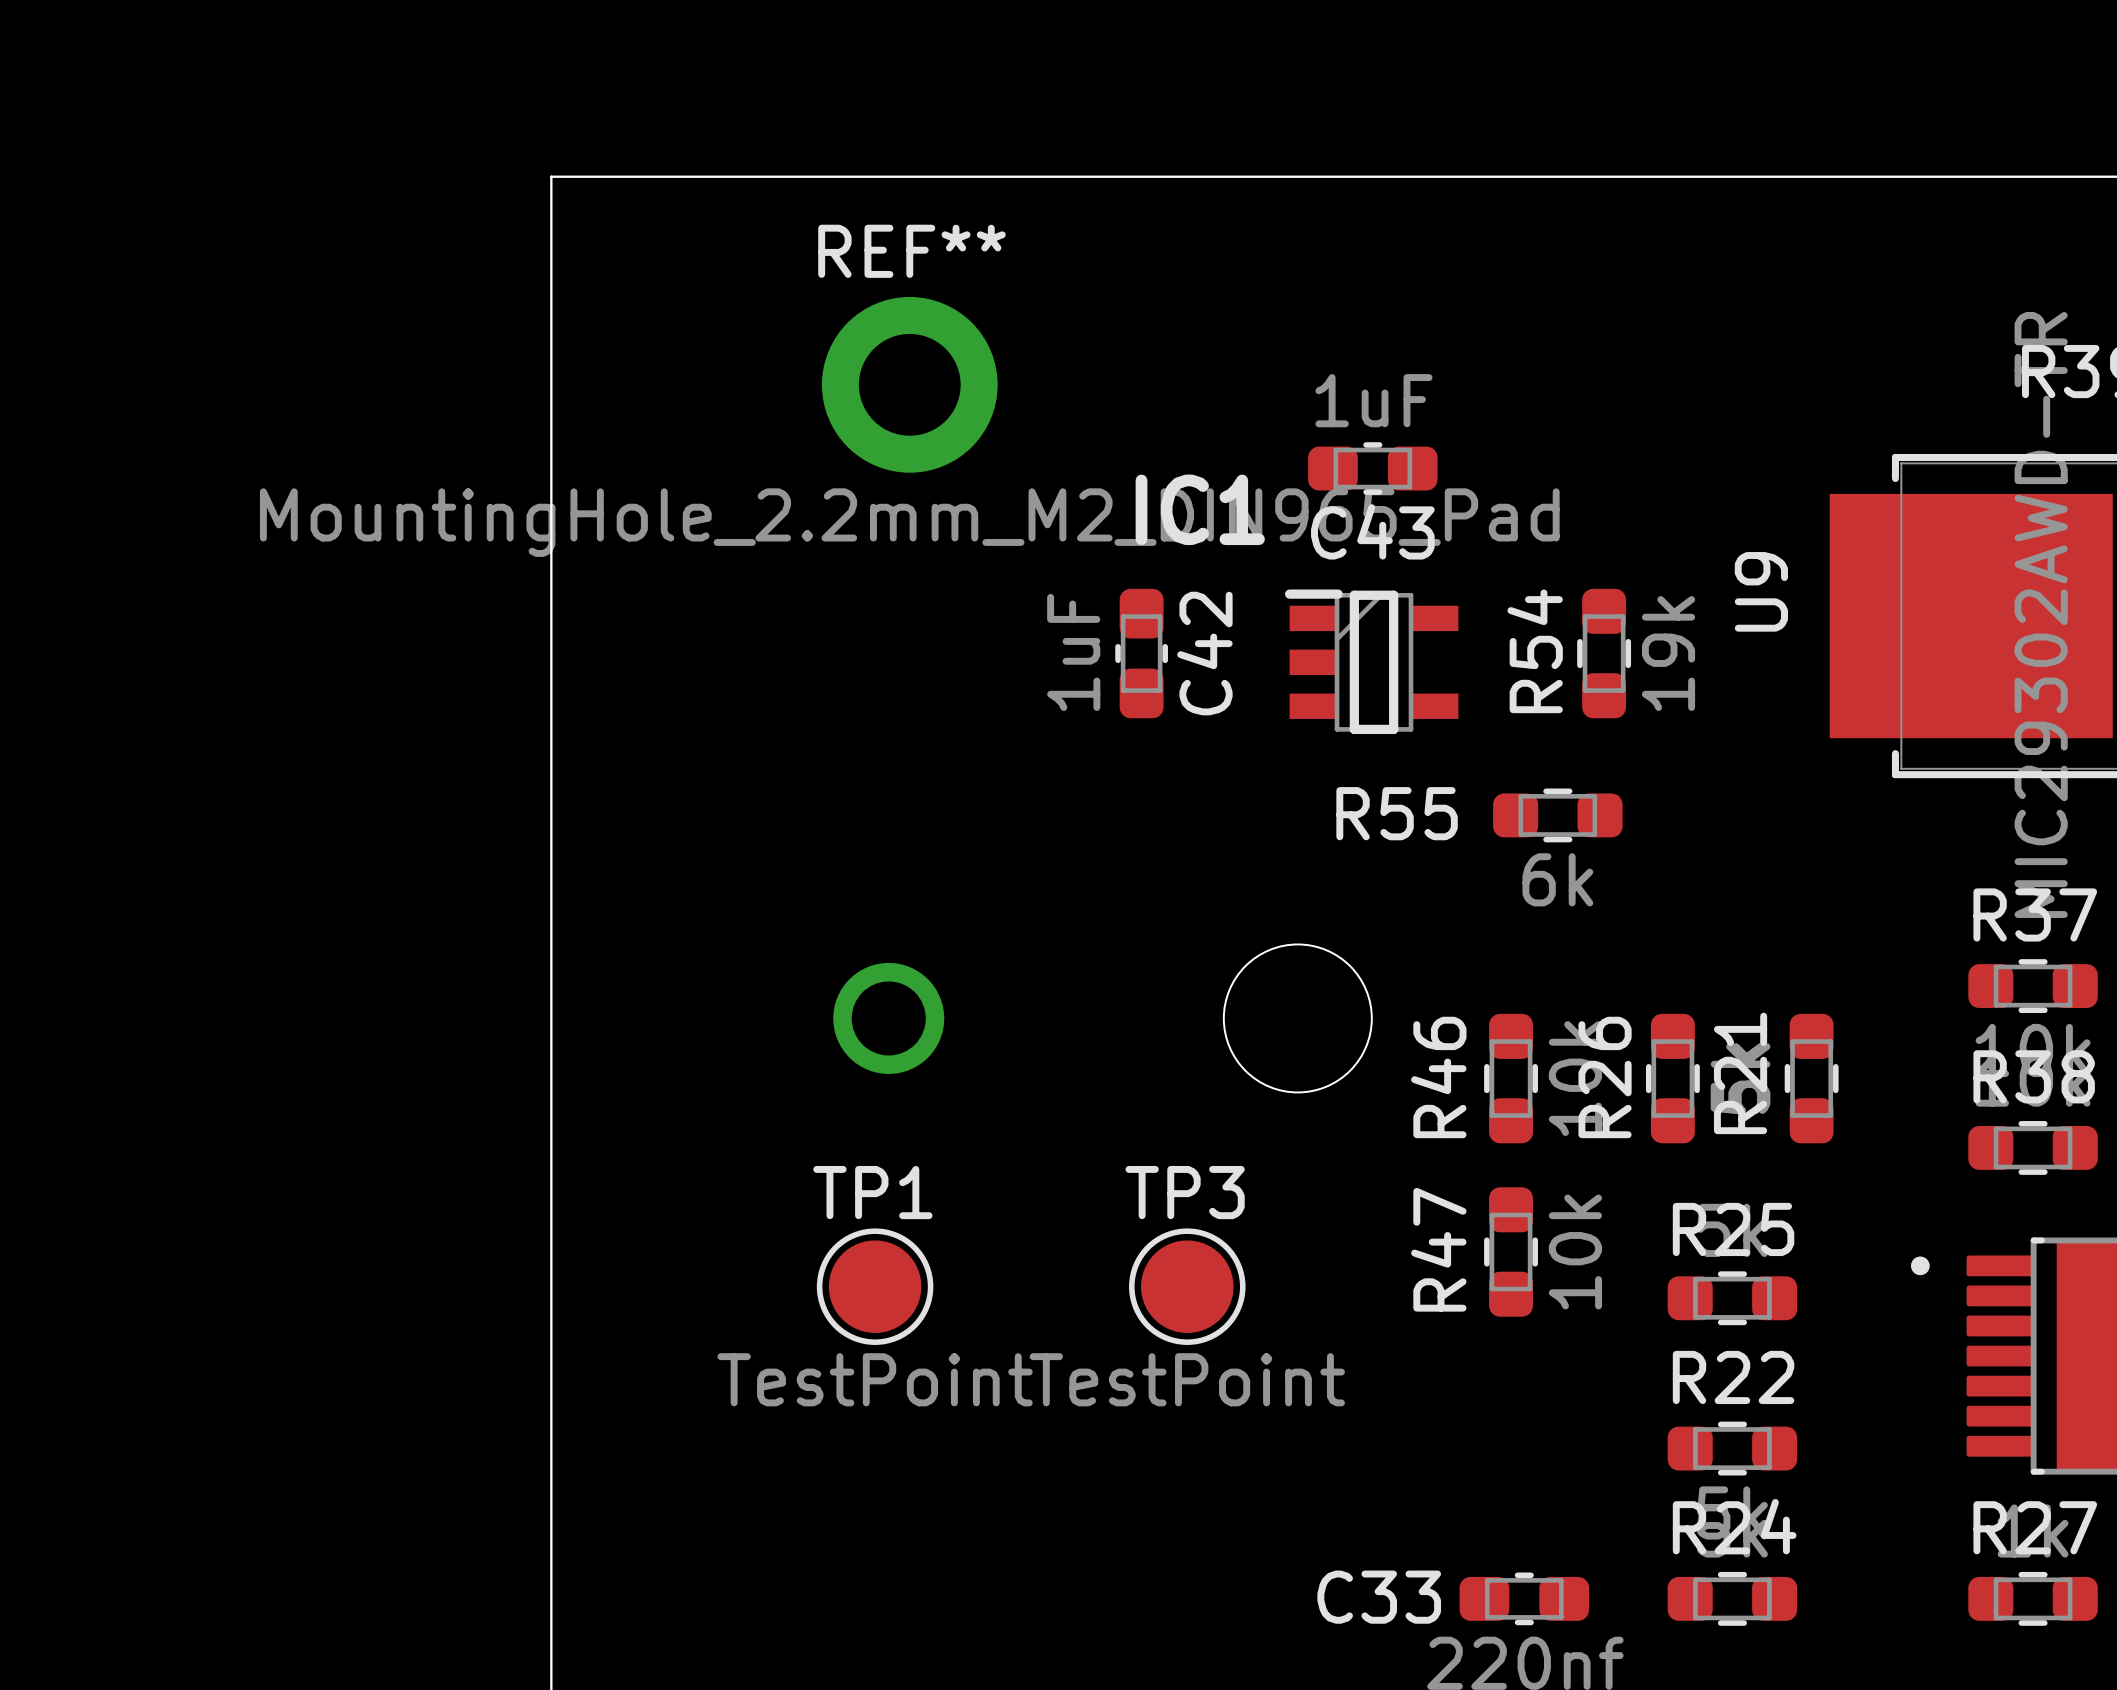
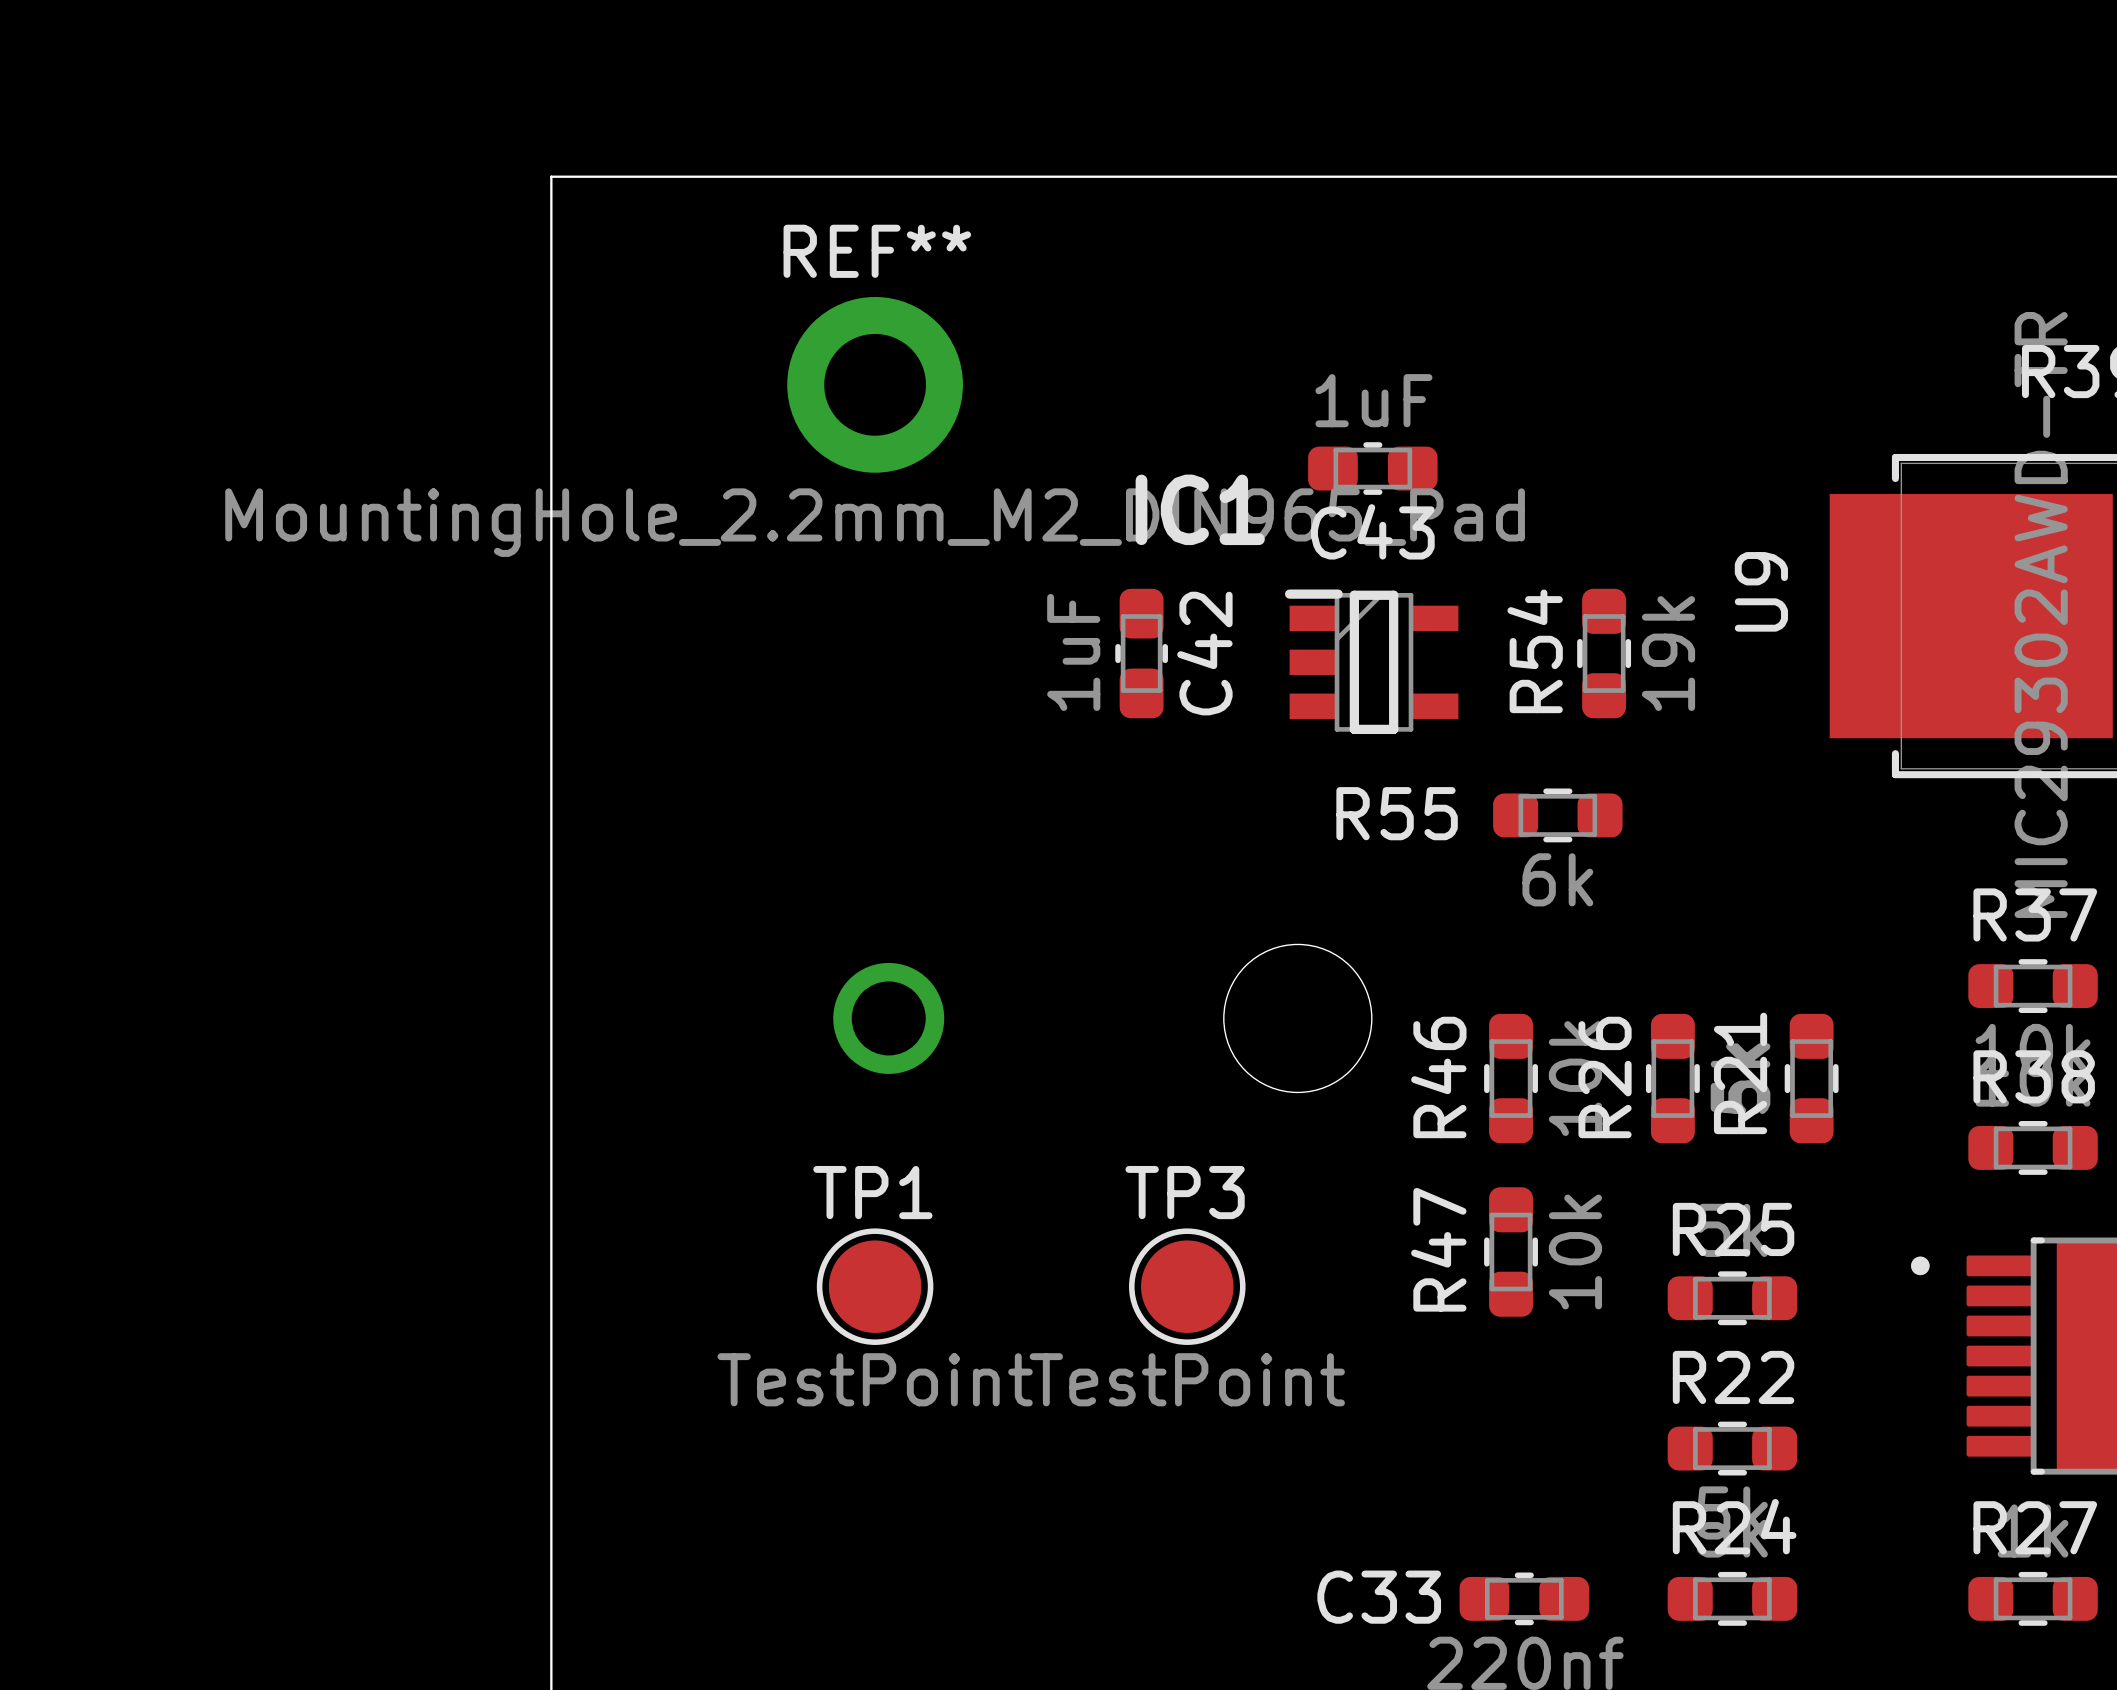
REF** position: (909, 384) -> (875, 384)

